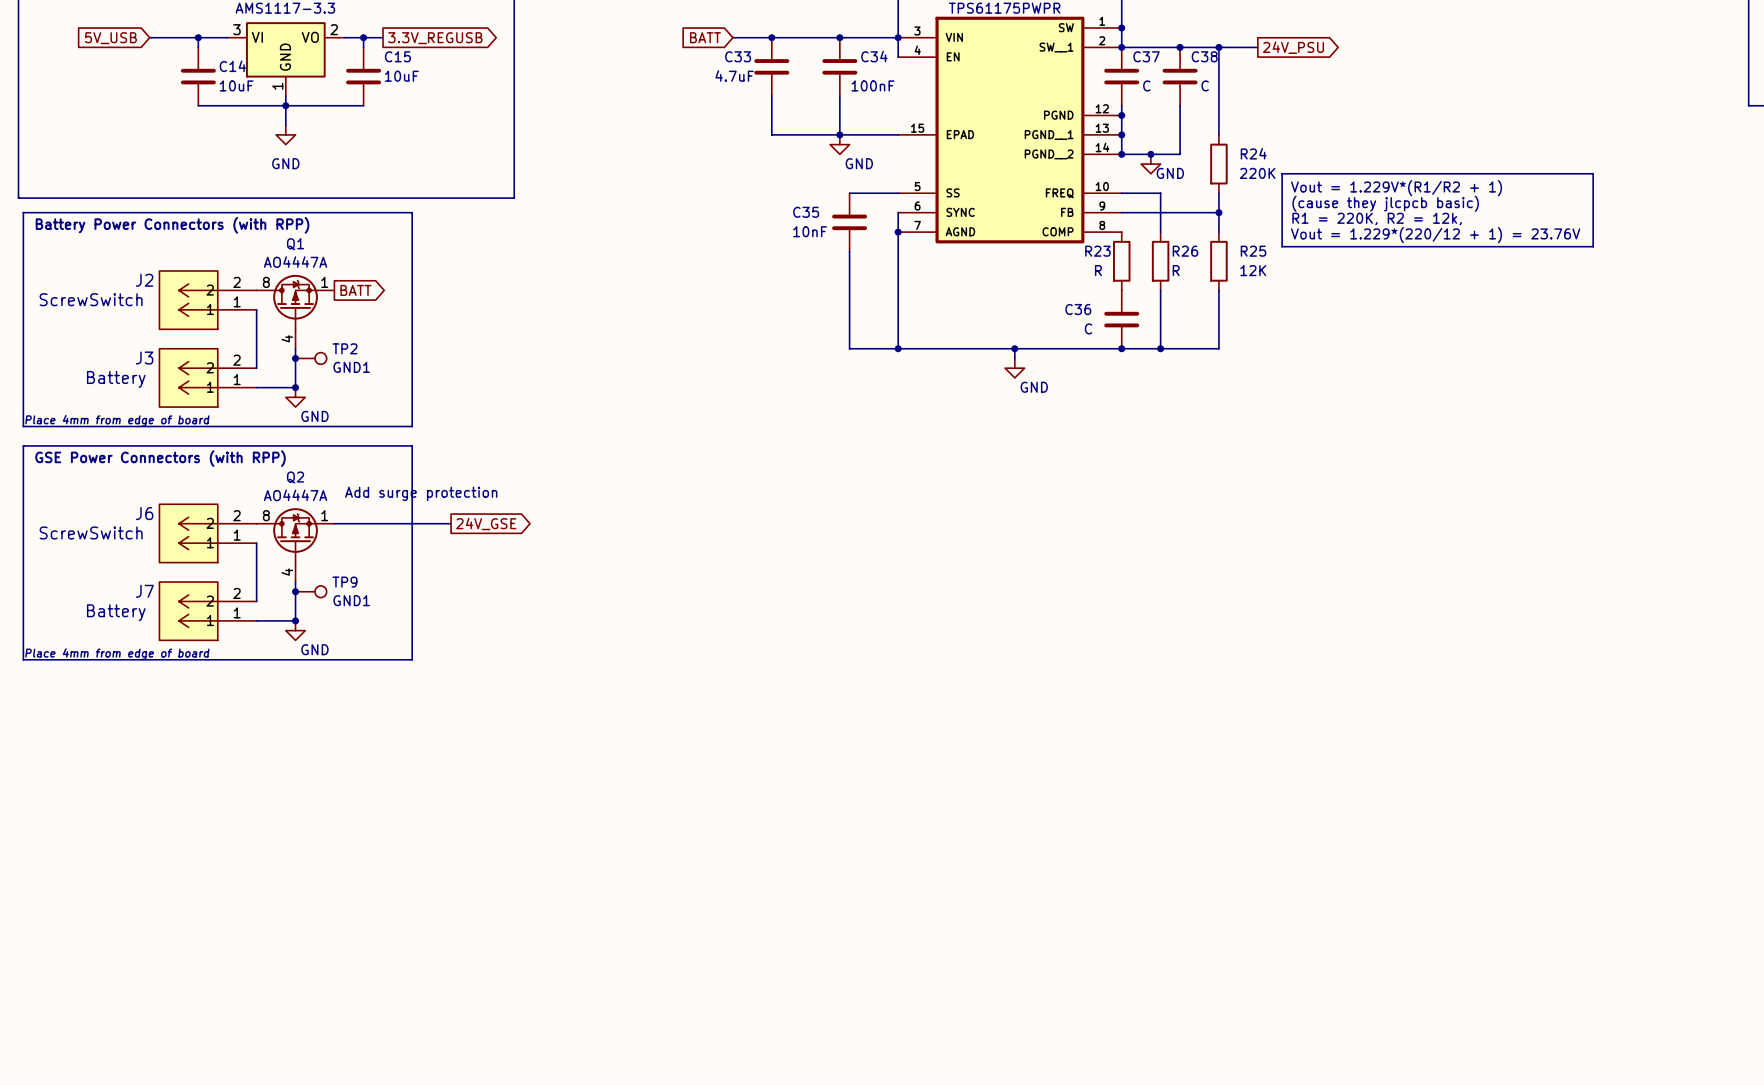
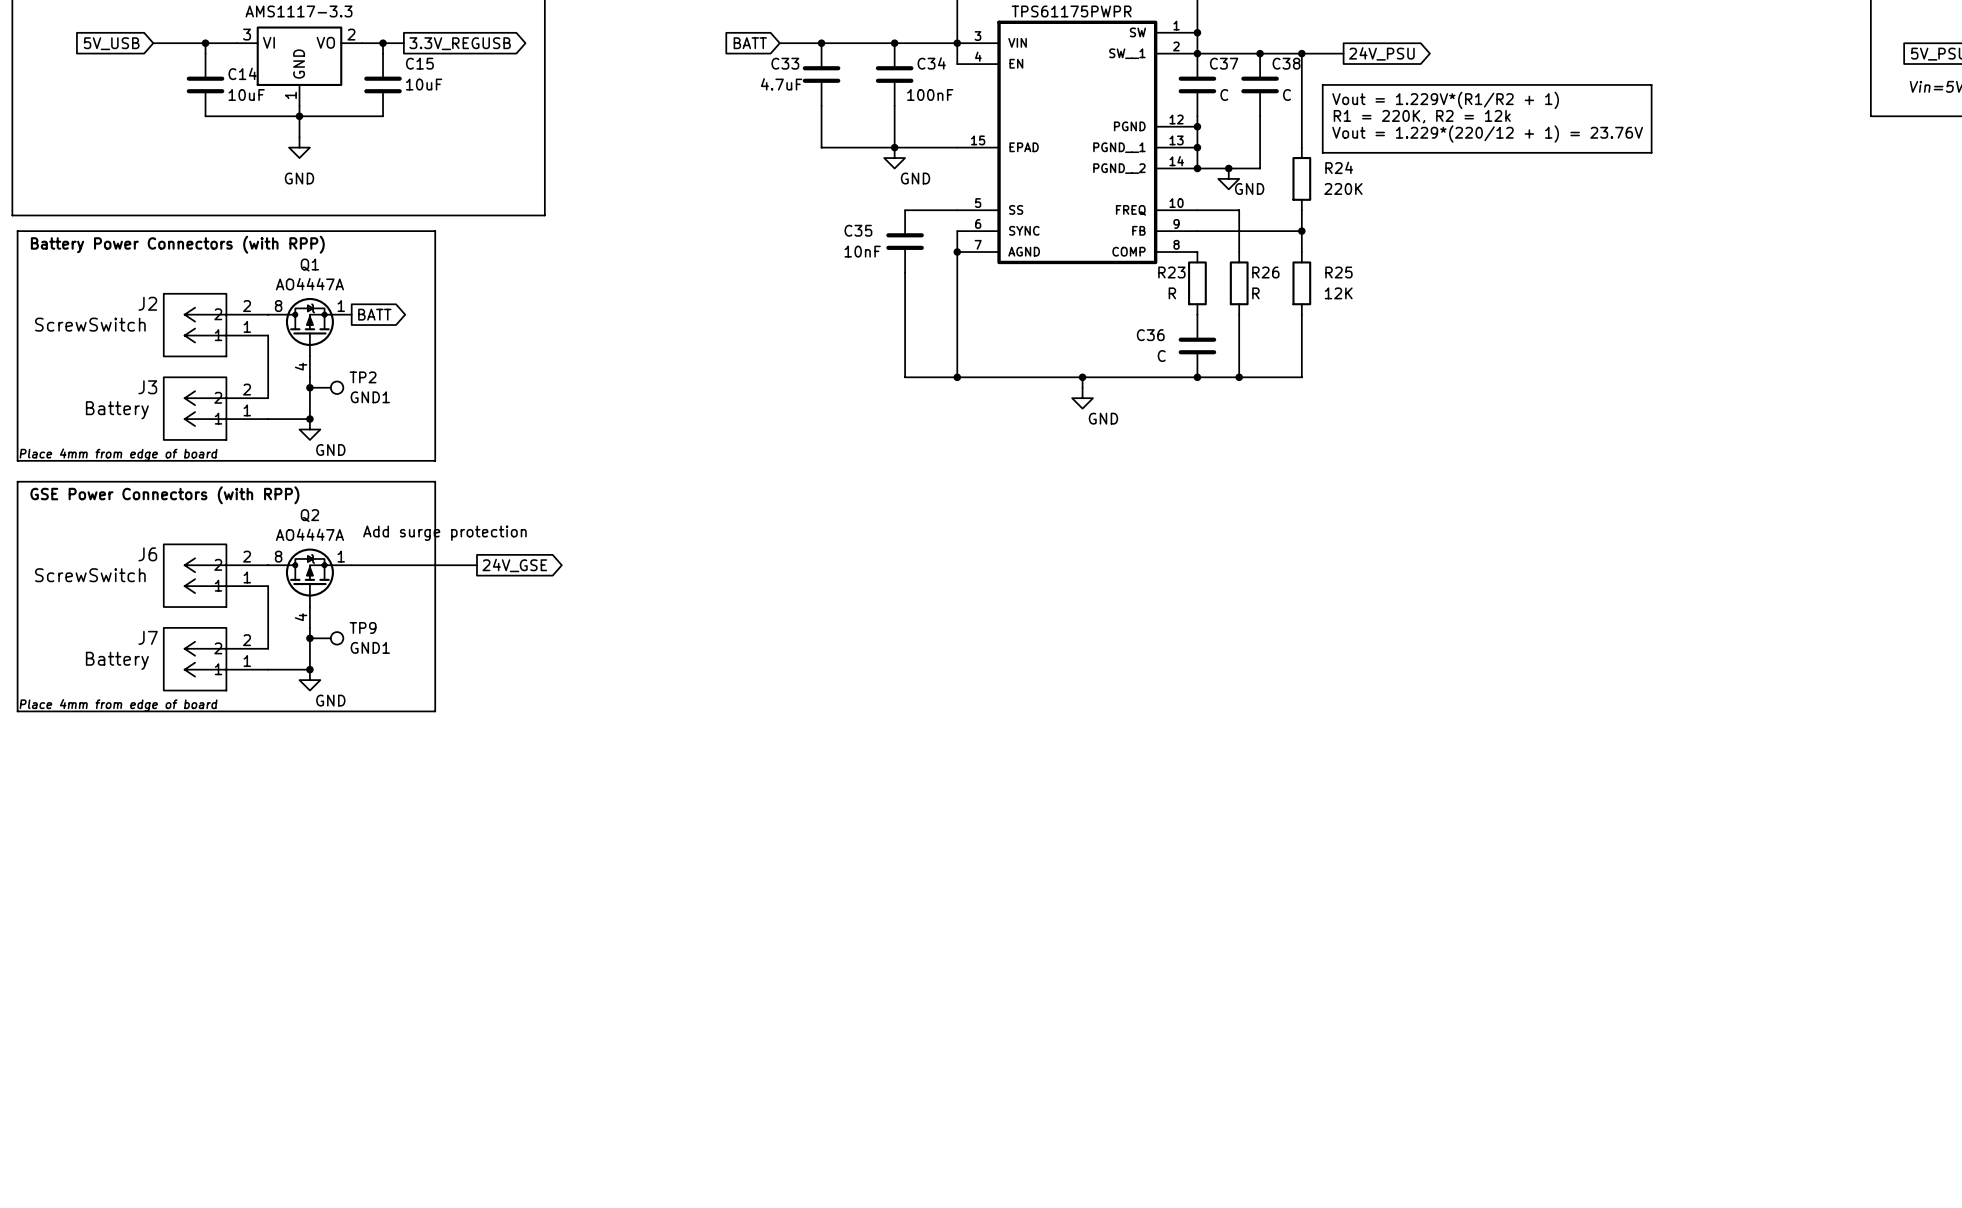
line: none -> (1322, 84) (1651, 84) (1651, 152) (1322, 152) (1322, 84)
text: none -> R1 = 220K, R2 = 12k (1422, 116)
line: (1282, 173) (1593, 173) (1593, 246) (1282, 246) (1282, 173) -> none
text position: Vout = 1.229V*(R1/R2 + 1) (1396, 188) -> Vout = 1.229V*(R1/R2 + 1) (1445, 100)
text: (cause they jlcpcb basic) (1385, 203) -> none
text: R1 = 220K, R2 = 12k, (1377, 218) -> none
text position: Vout = 1.229*(220/12 + 1) = 23.76V (1435, 235) -> Vout = 1.229*(220/12 + 1) = 23.76V (1487, 133)

